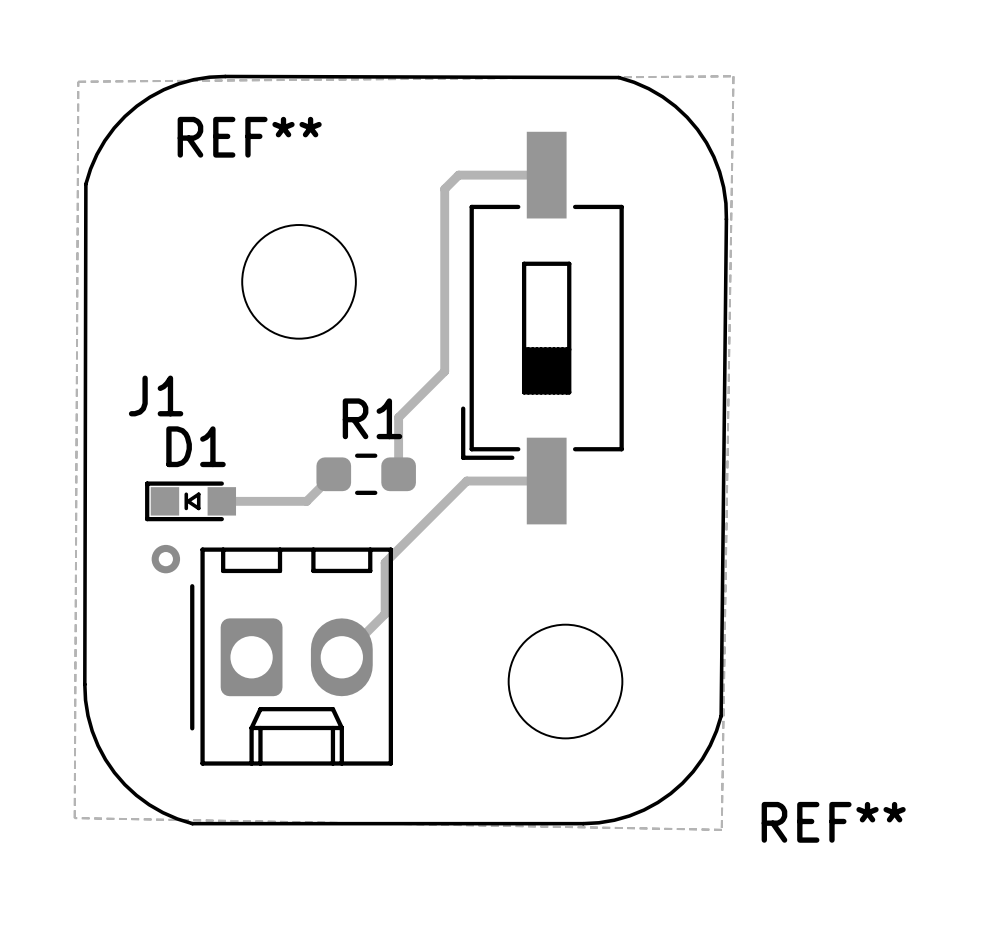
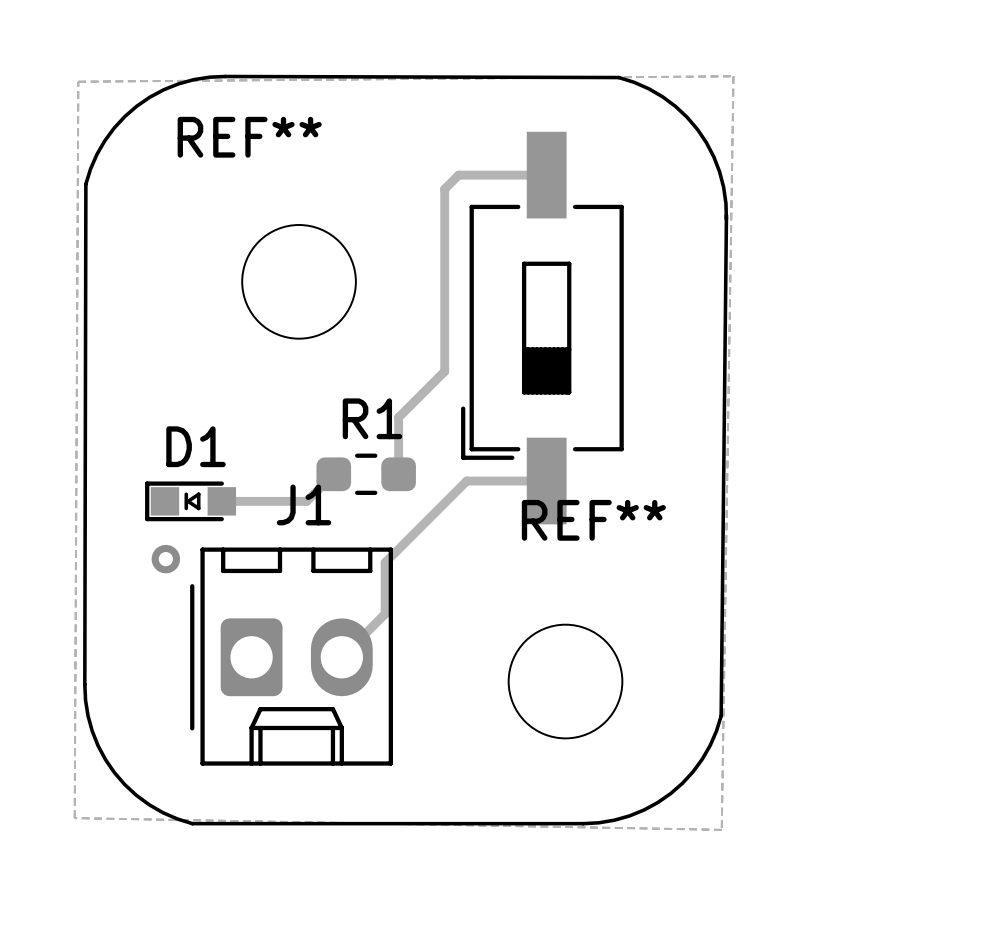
J1 name position: J1 (156, 395) -> J1 (304, 504)
REF** name position: REF** (833, 822) -> REF** (593, 520)

